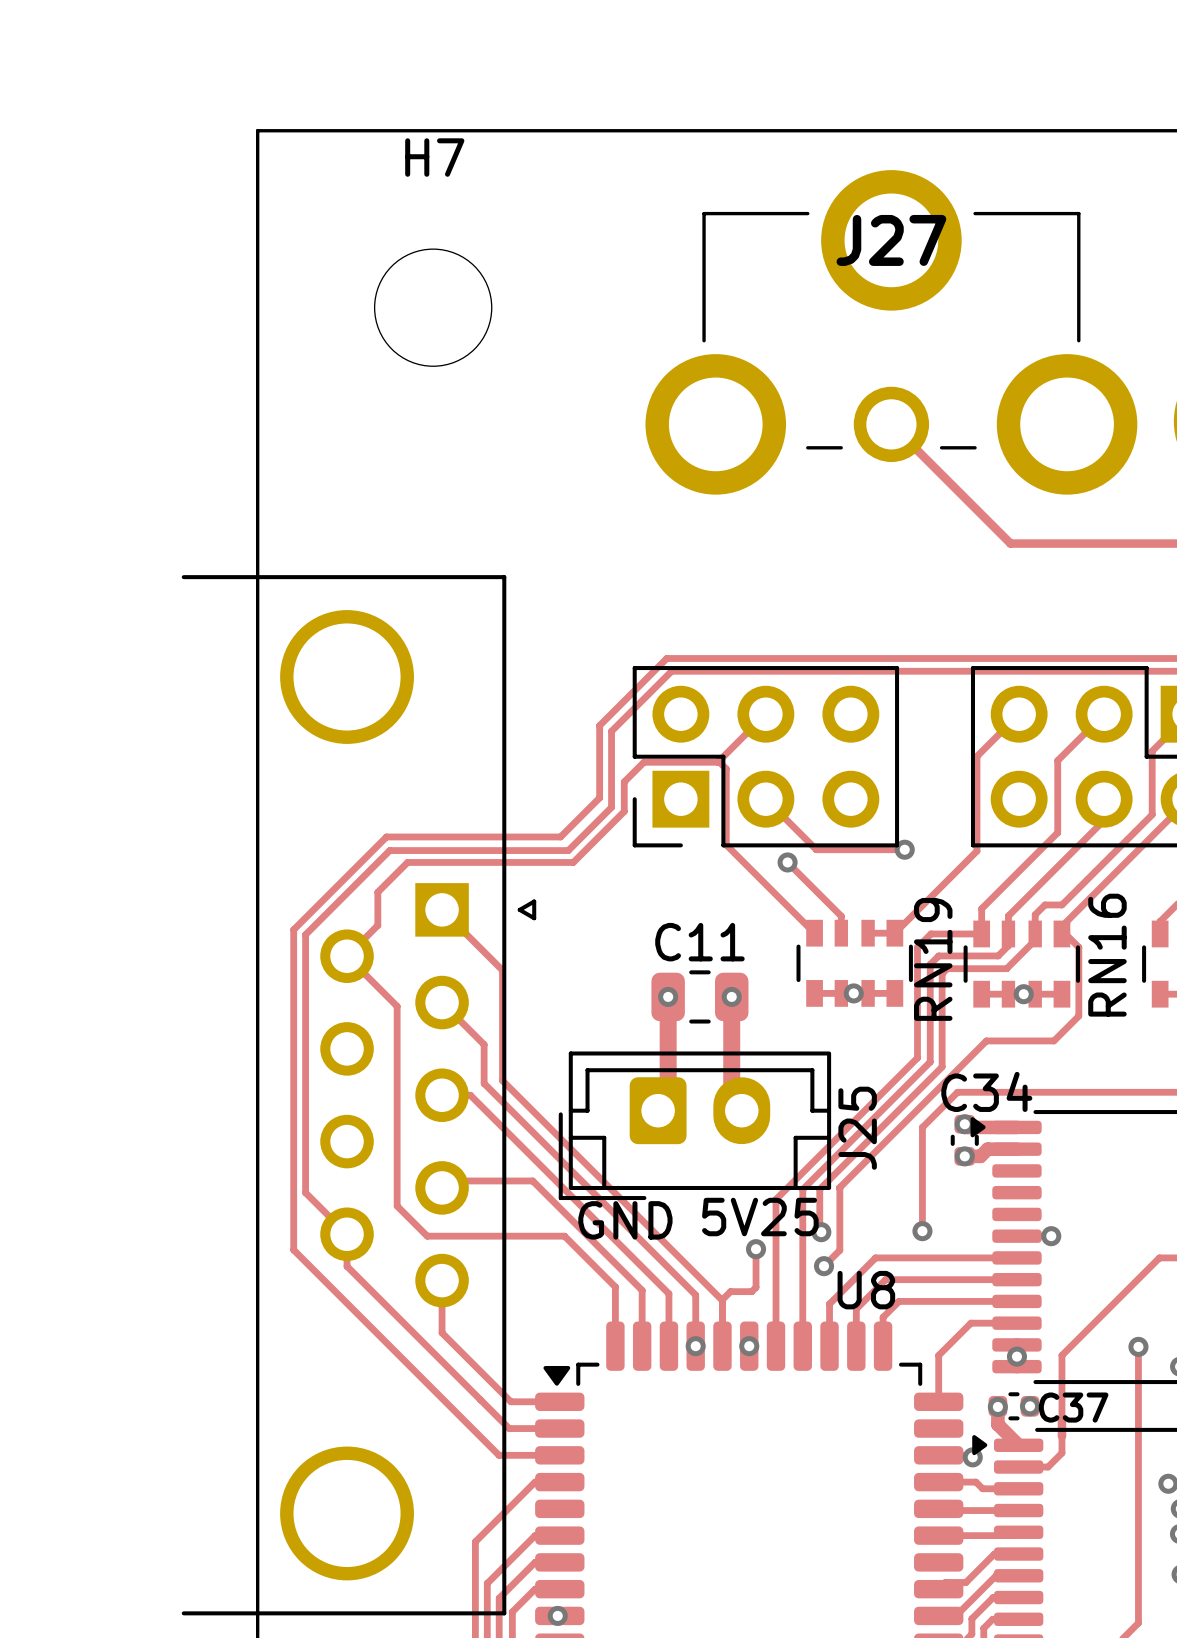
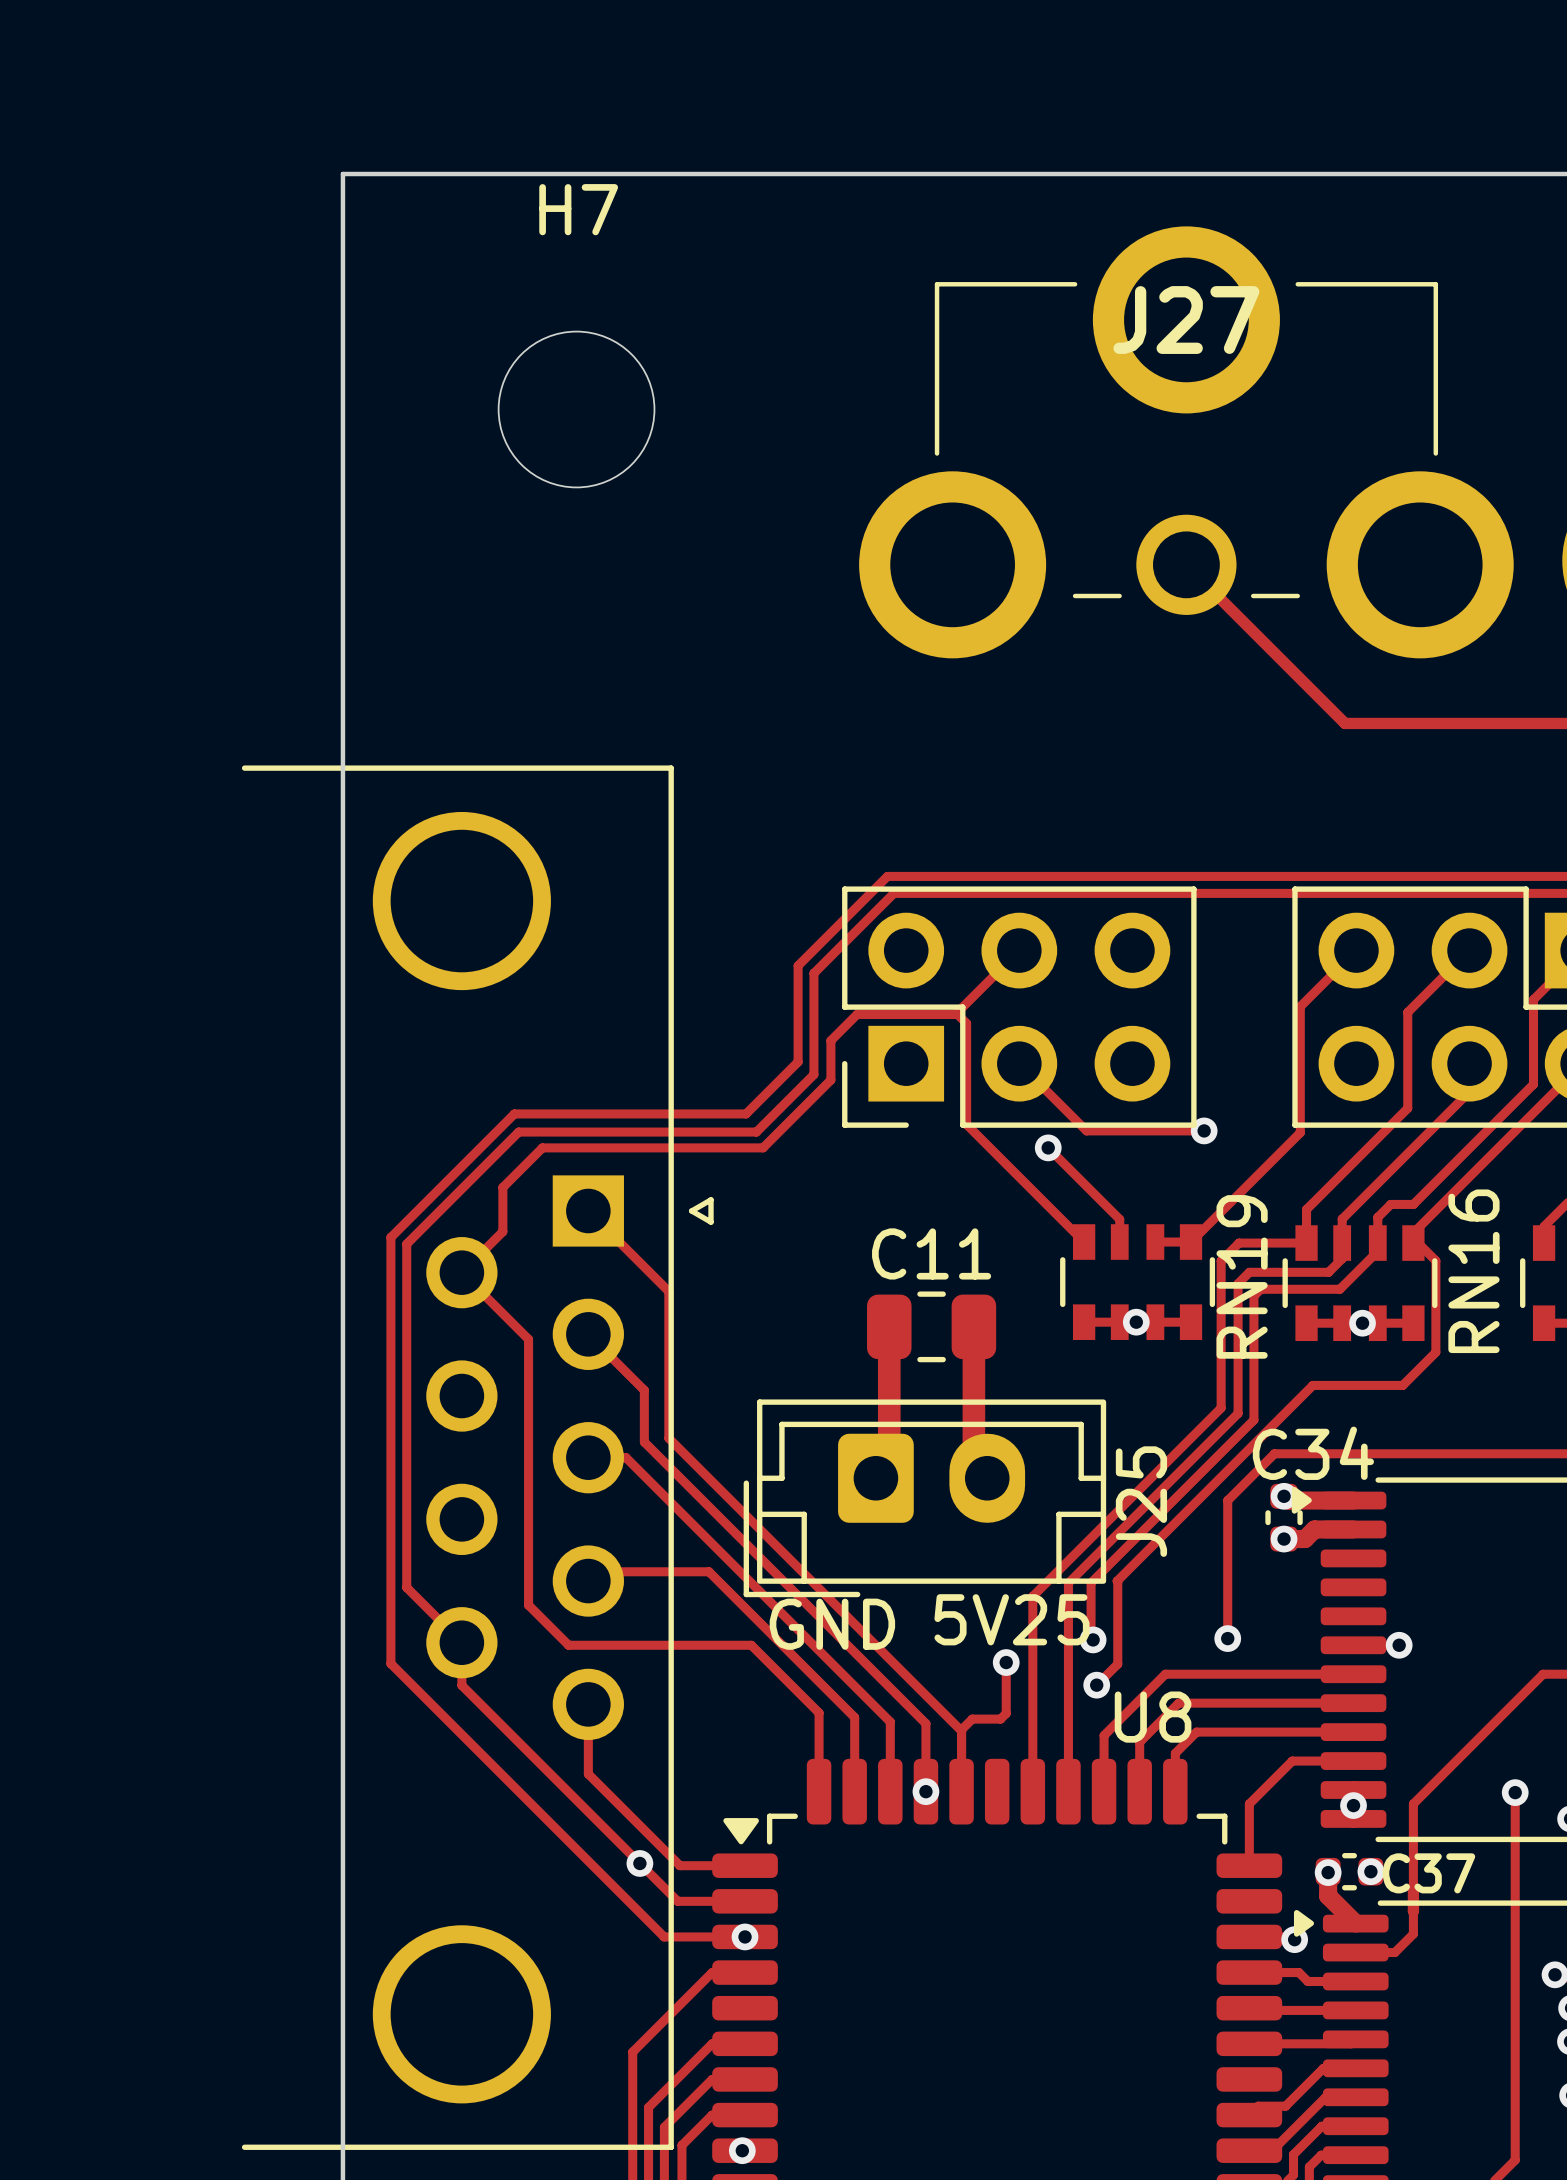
via: (668, 996) -> none
via: (731, 996) -> none
via: (749, 1346) -> none
via: none -> (639, 1863)
via: none -> (745, 1936)

